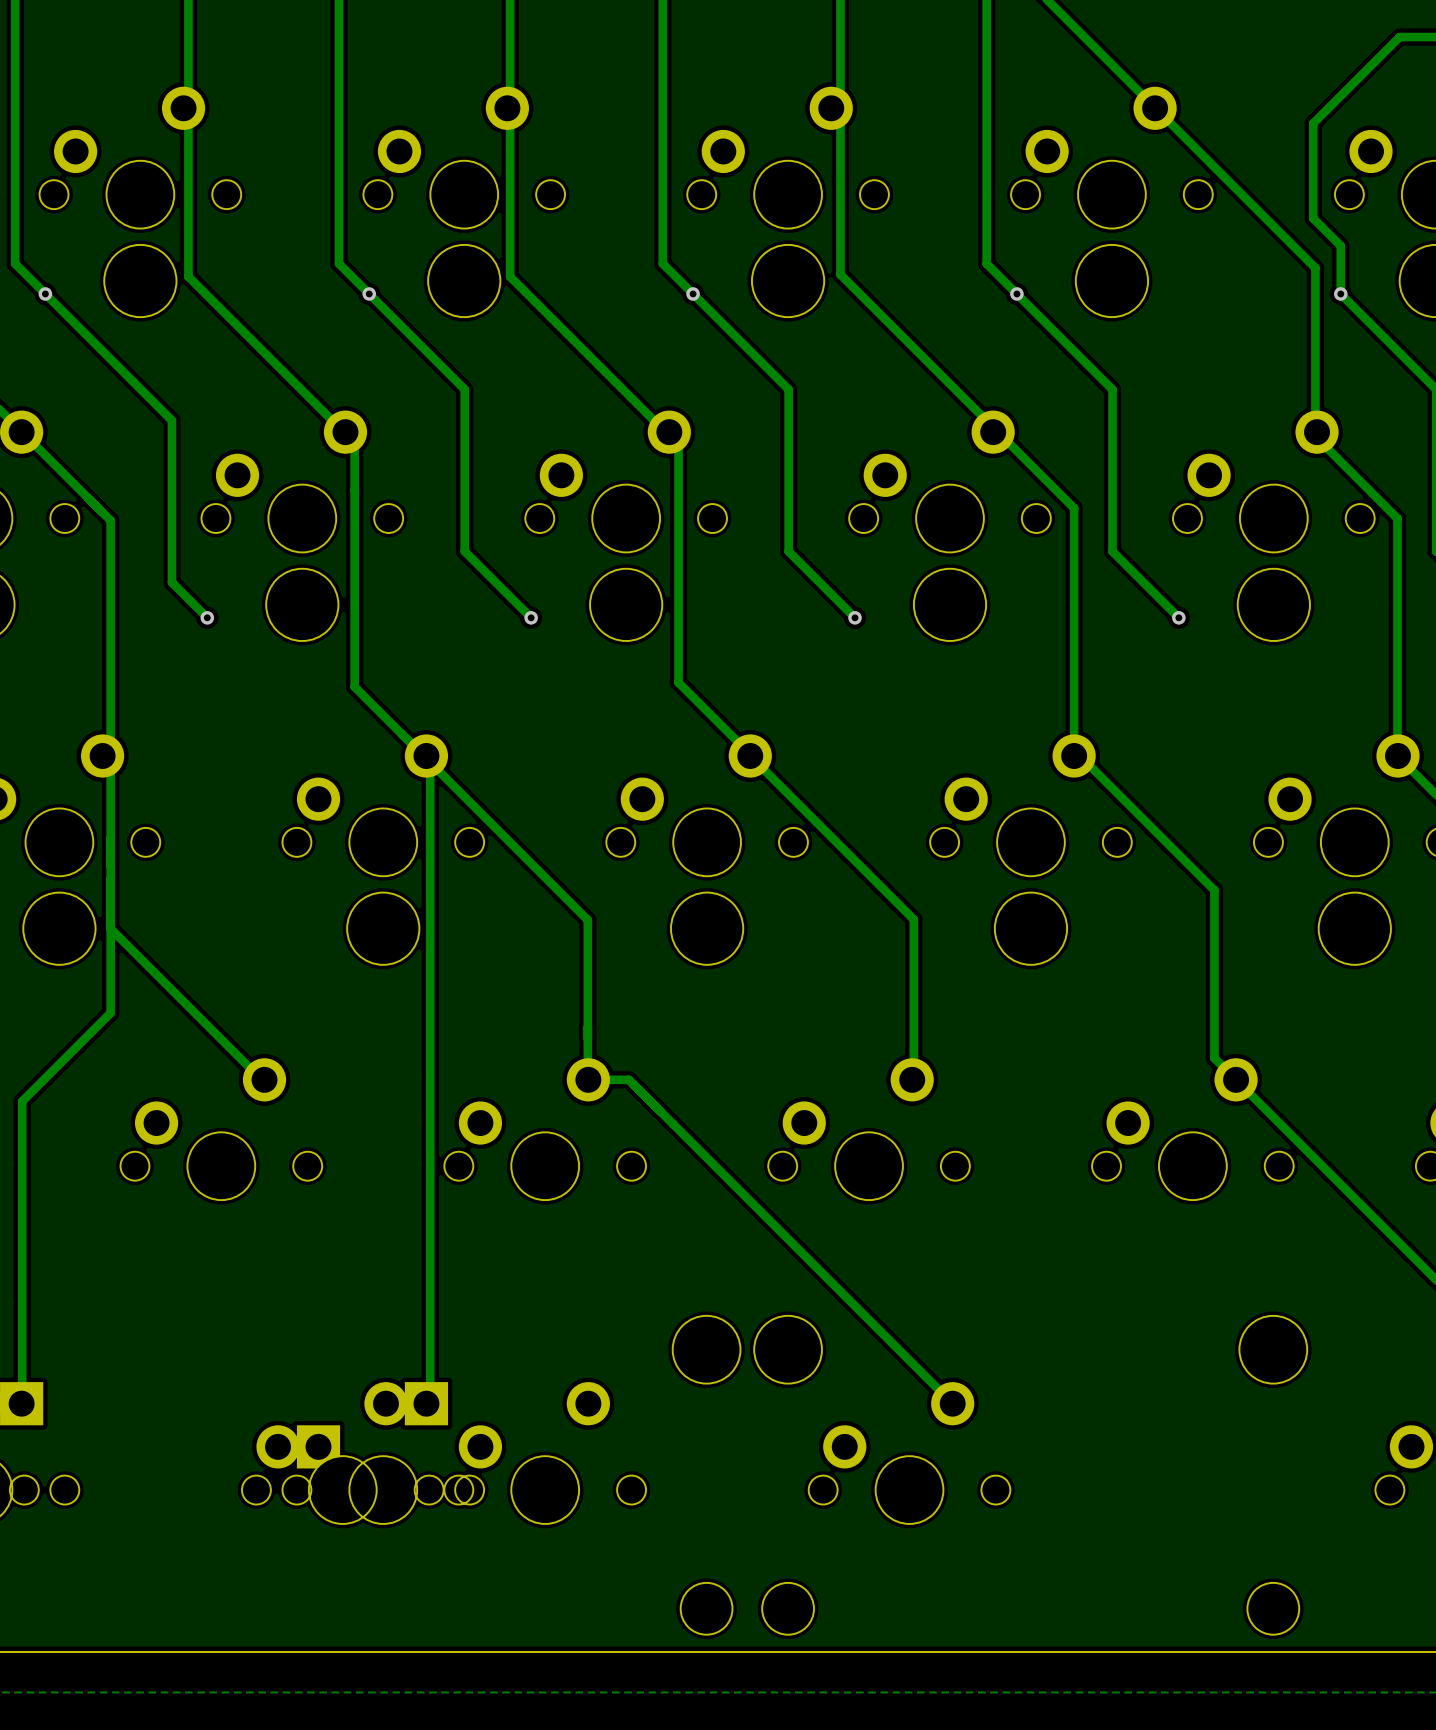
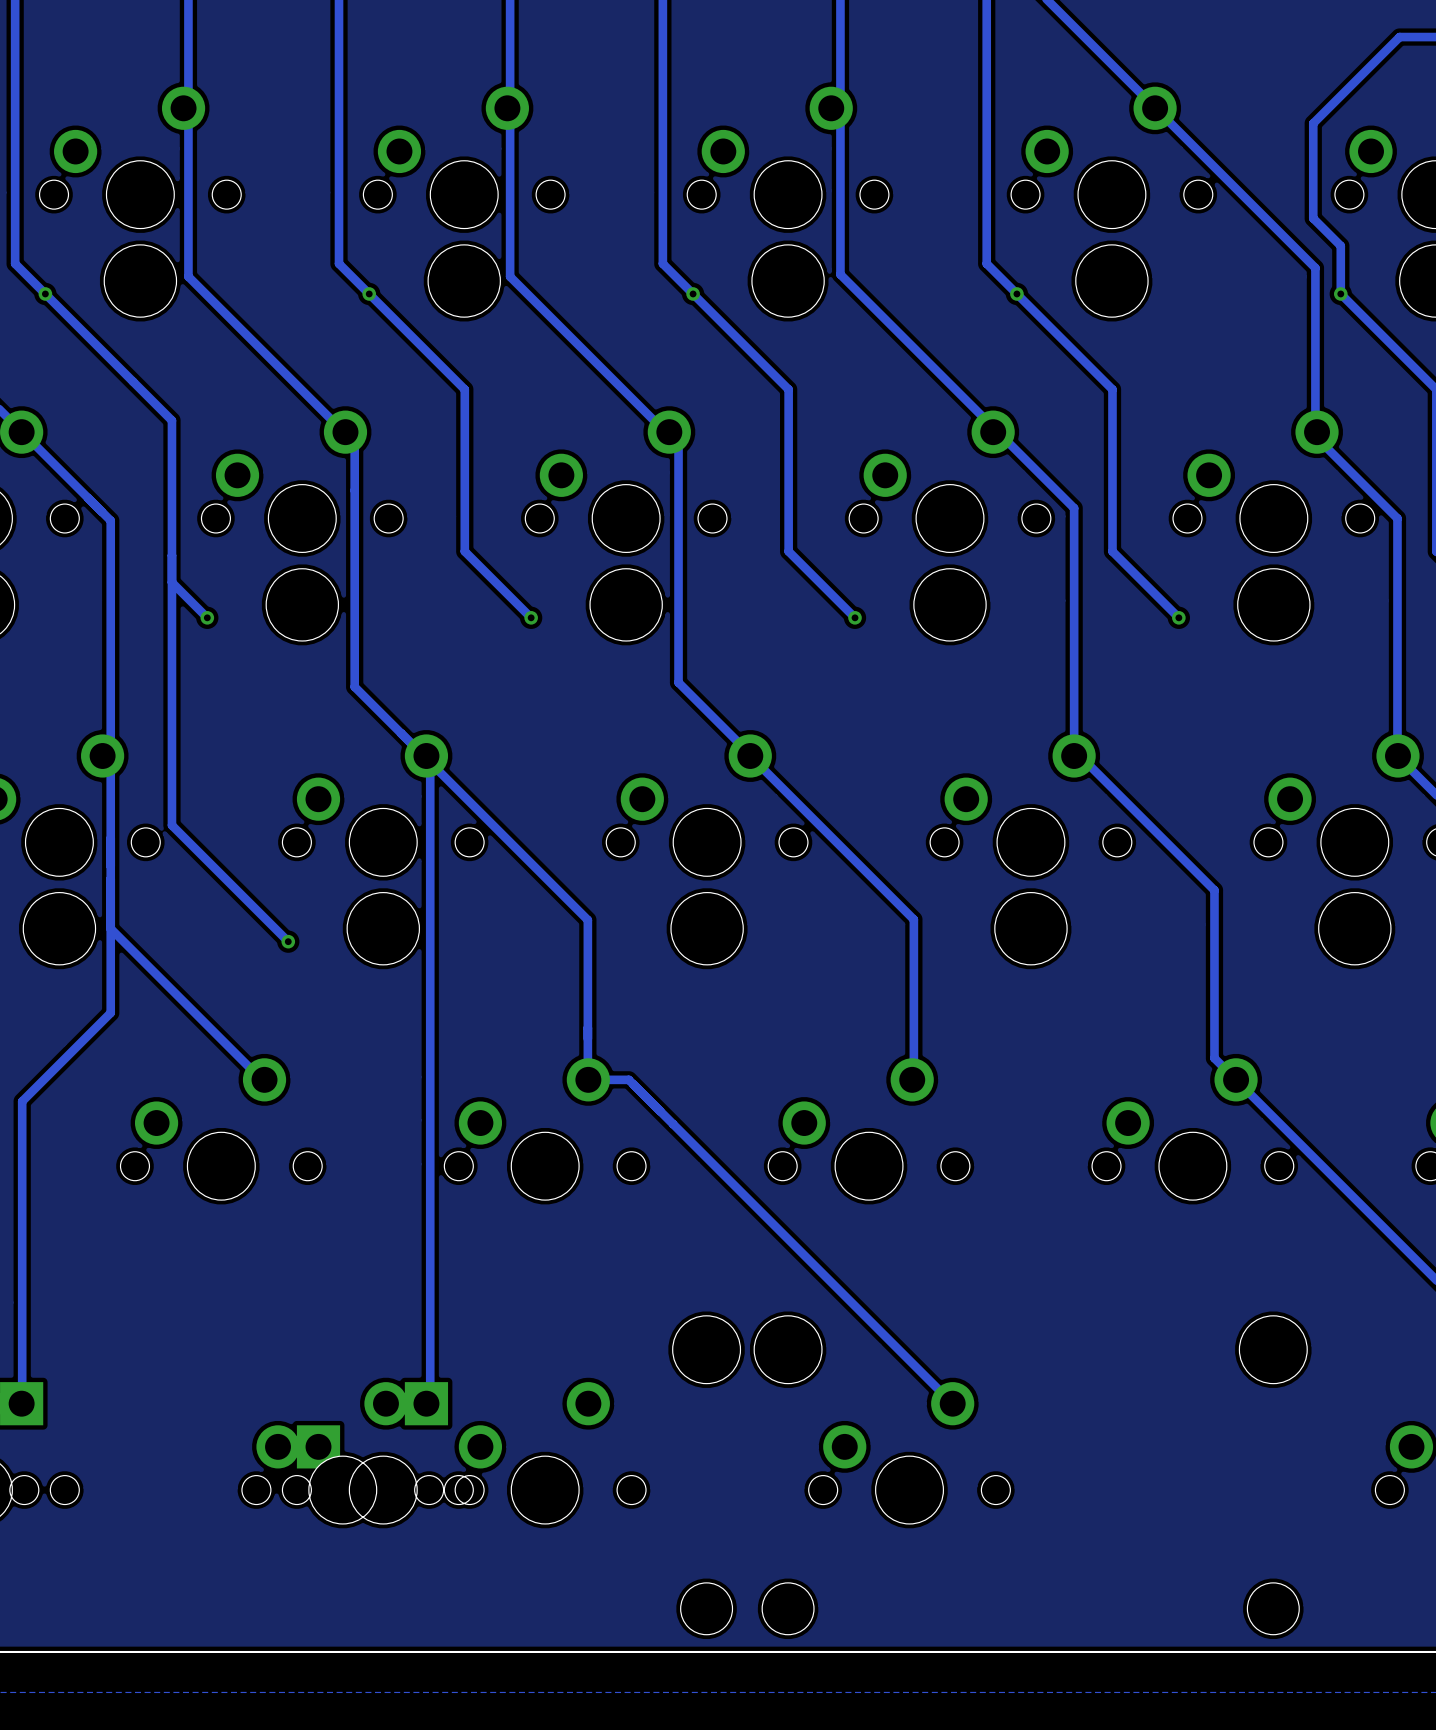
track: none -> (171, 582) (171, 825) (288, 941)
via: none -> (288, 941)

